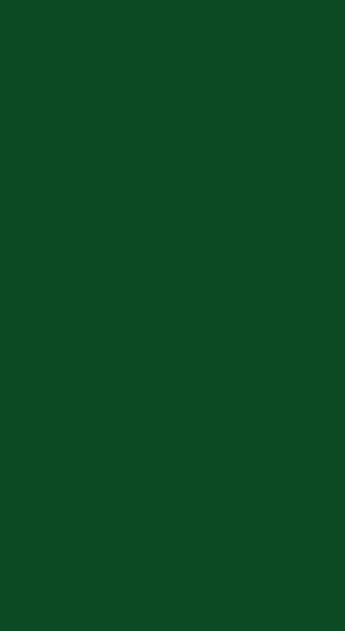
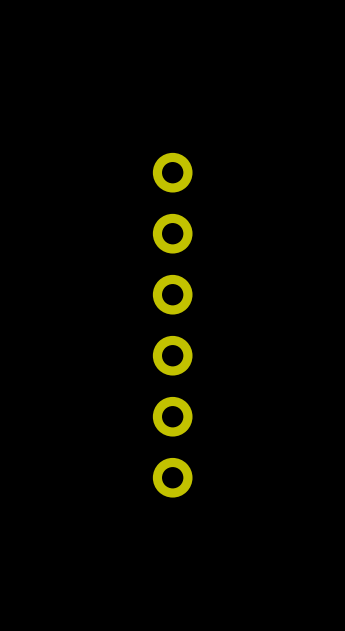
part: none -> (172, 325)

